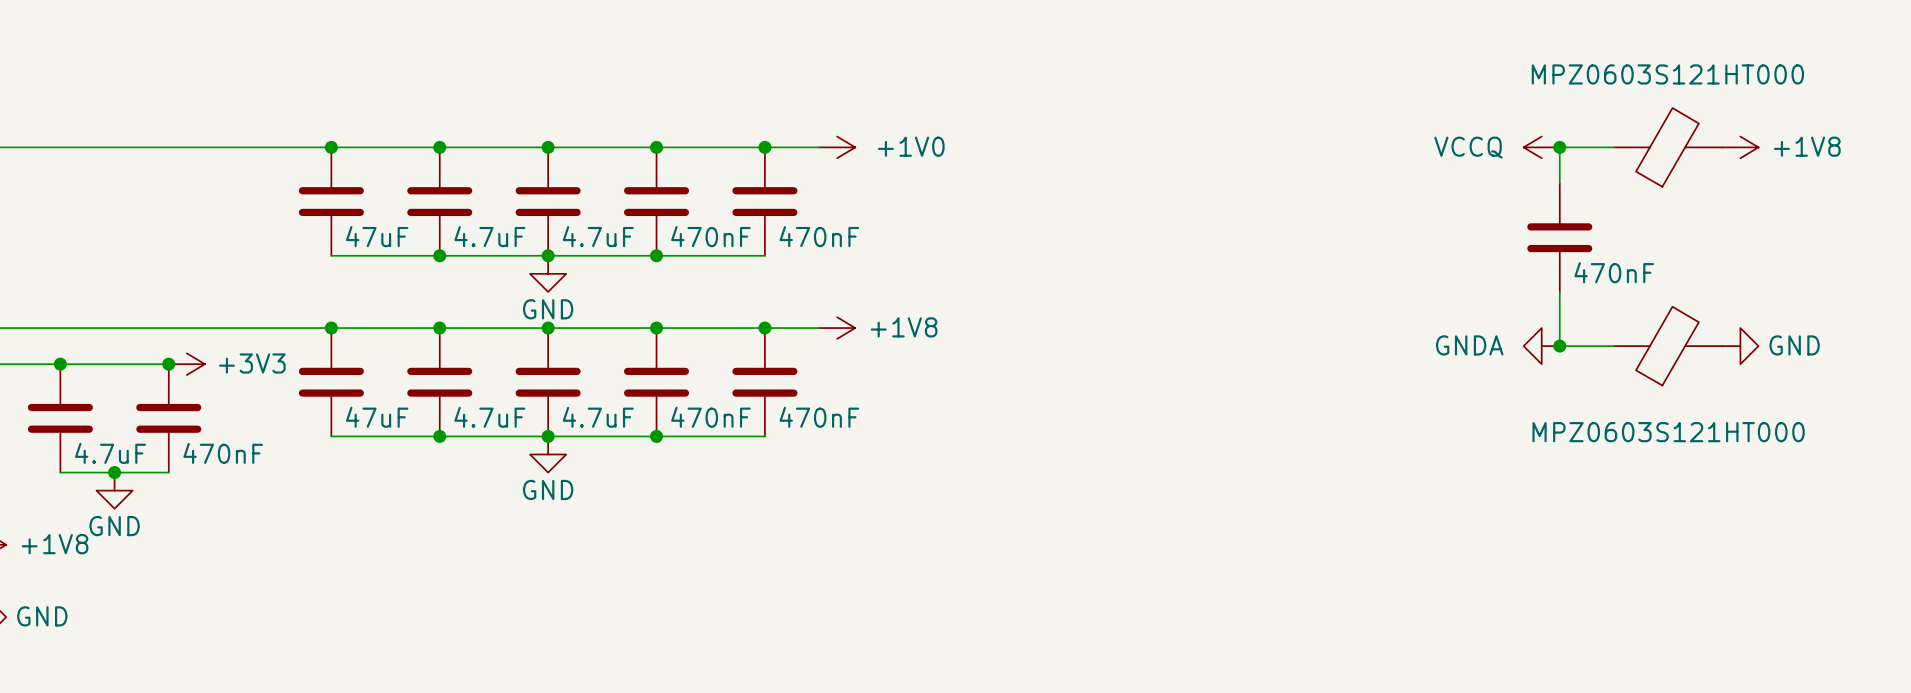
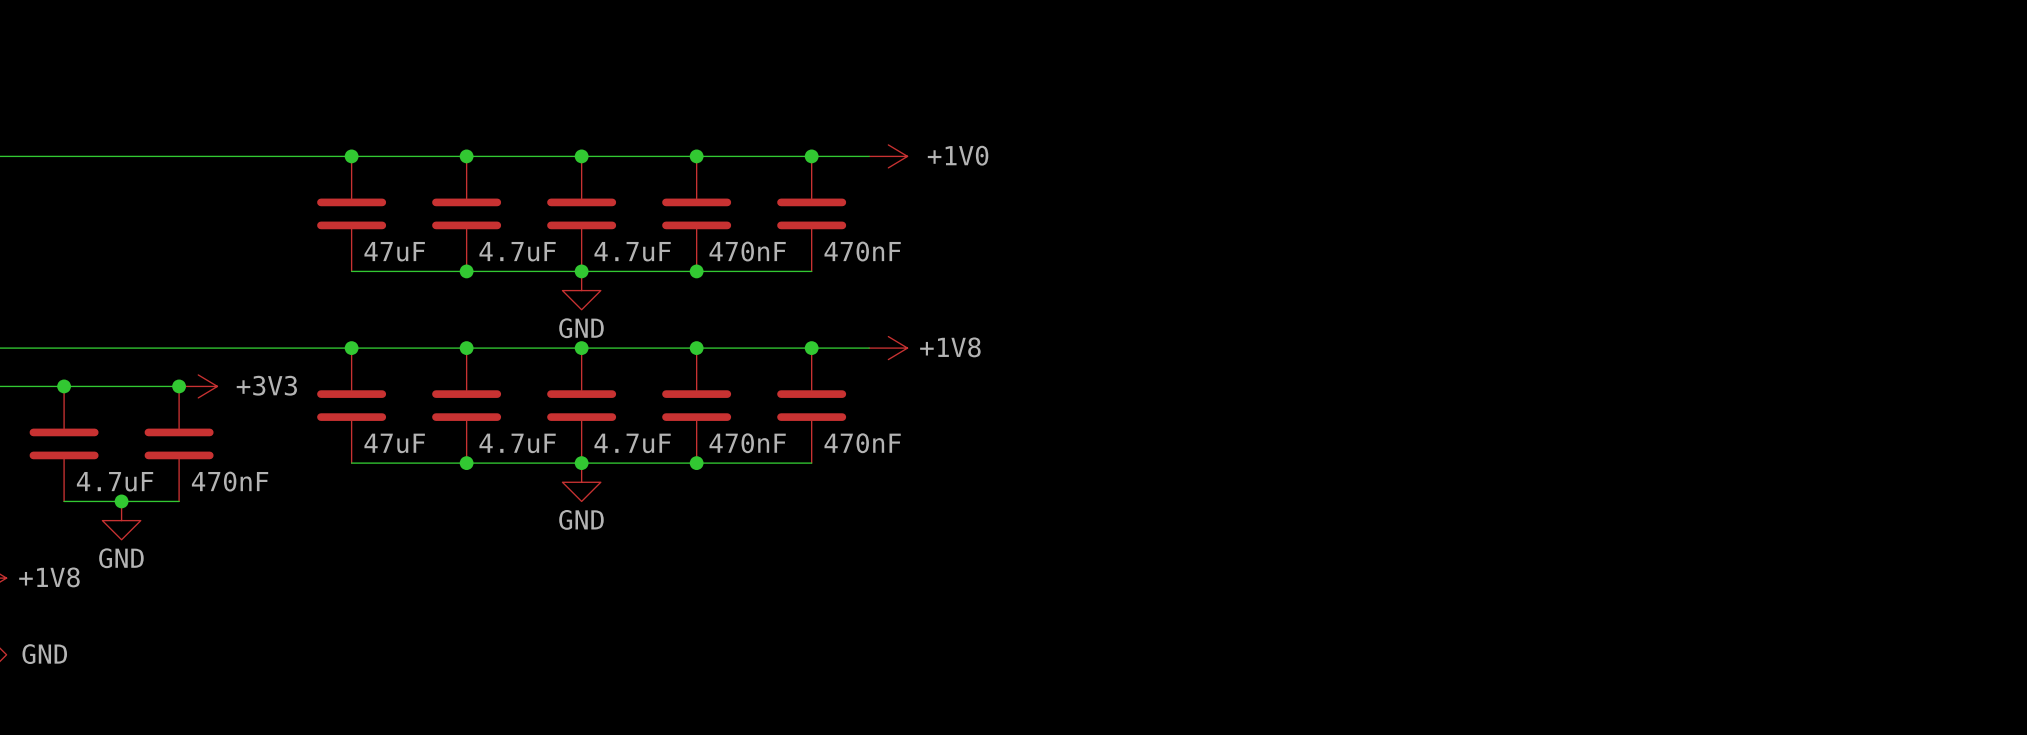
power symbol: VCCQ (1541, 147) -> none
junction: (1559, 147) -> none
wire: (1613, 147) (1559, 147) (1559, 183) -> none
part: MPZ0603S121HT000 (1668, 147) -> none
power symbol: +1V8 (1740, 147) -> none
part: 470nF (1559, 237) -> none
wire: (1559, 291) (1559, 346) (1613, 346) -> none
power symbol: GNDA (1541, 346) -> none
junction: (1559, 346) -> none
part: MPZ0603S121HT000 (1668, 346) -> none
power symbol: GND (1740, 346) -> none

